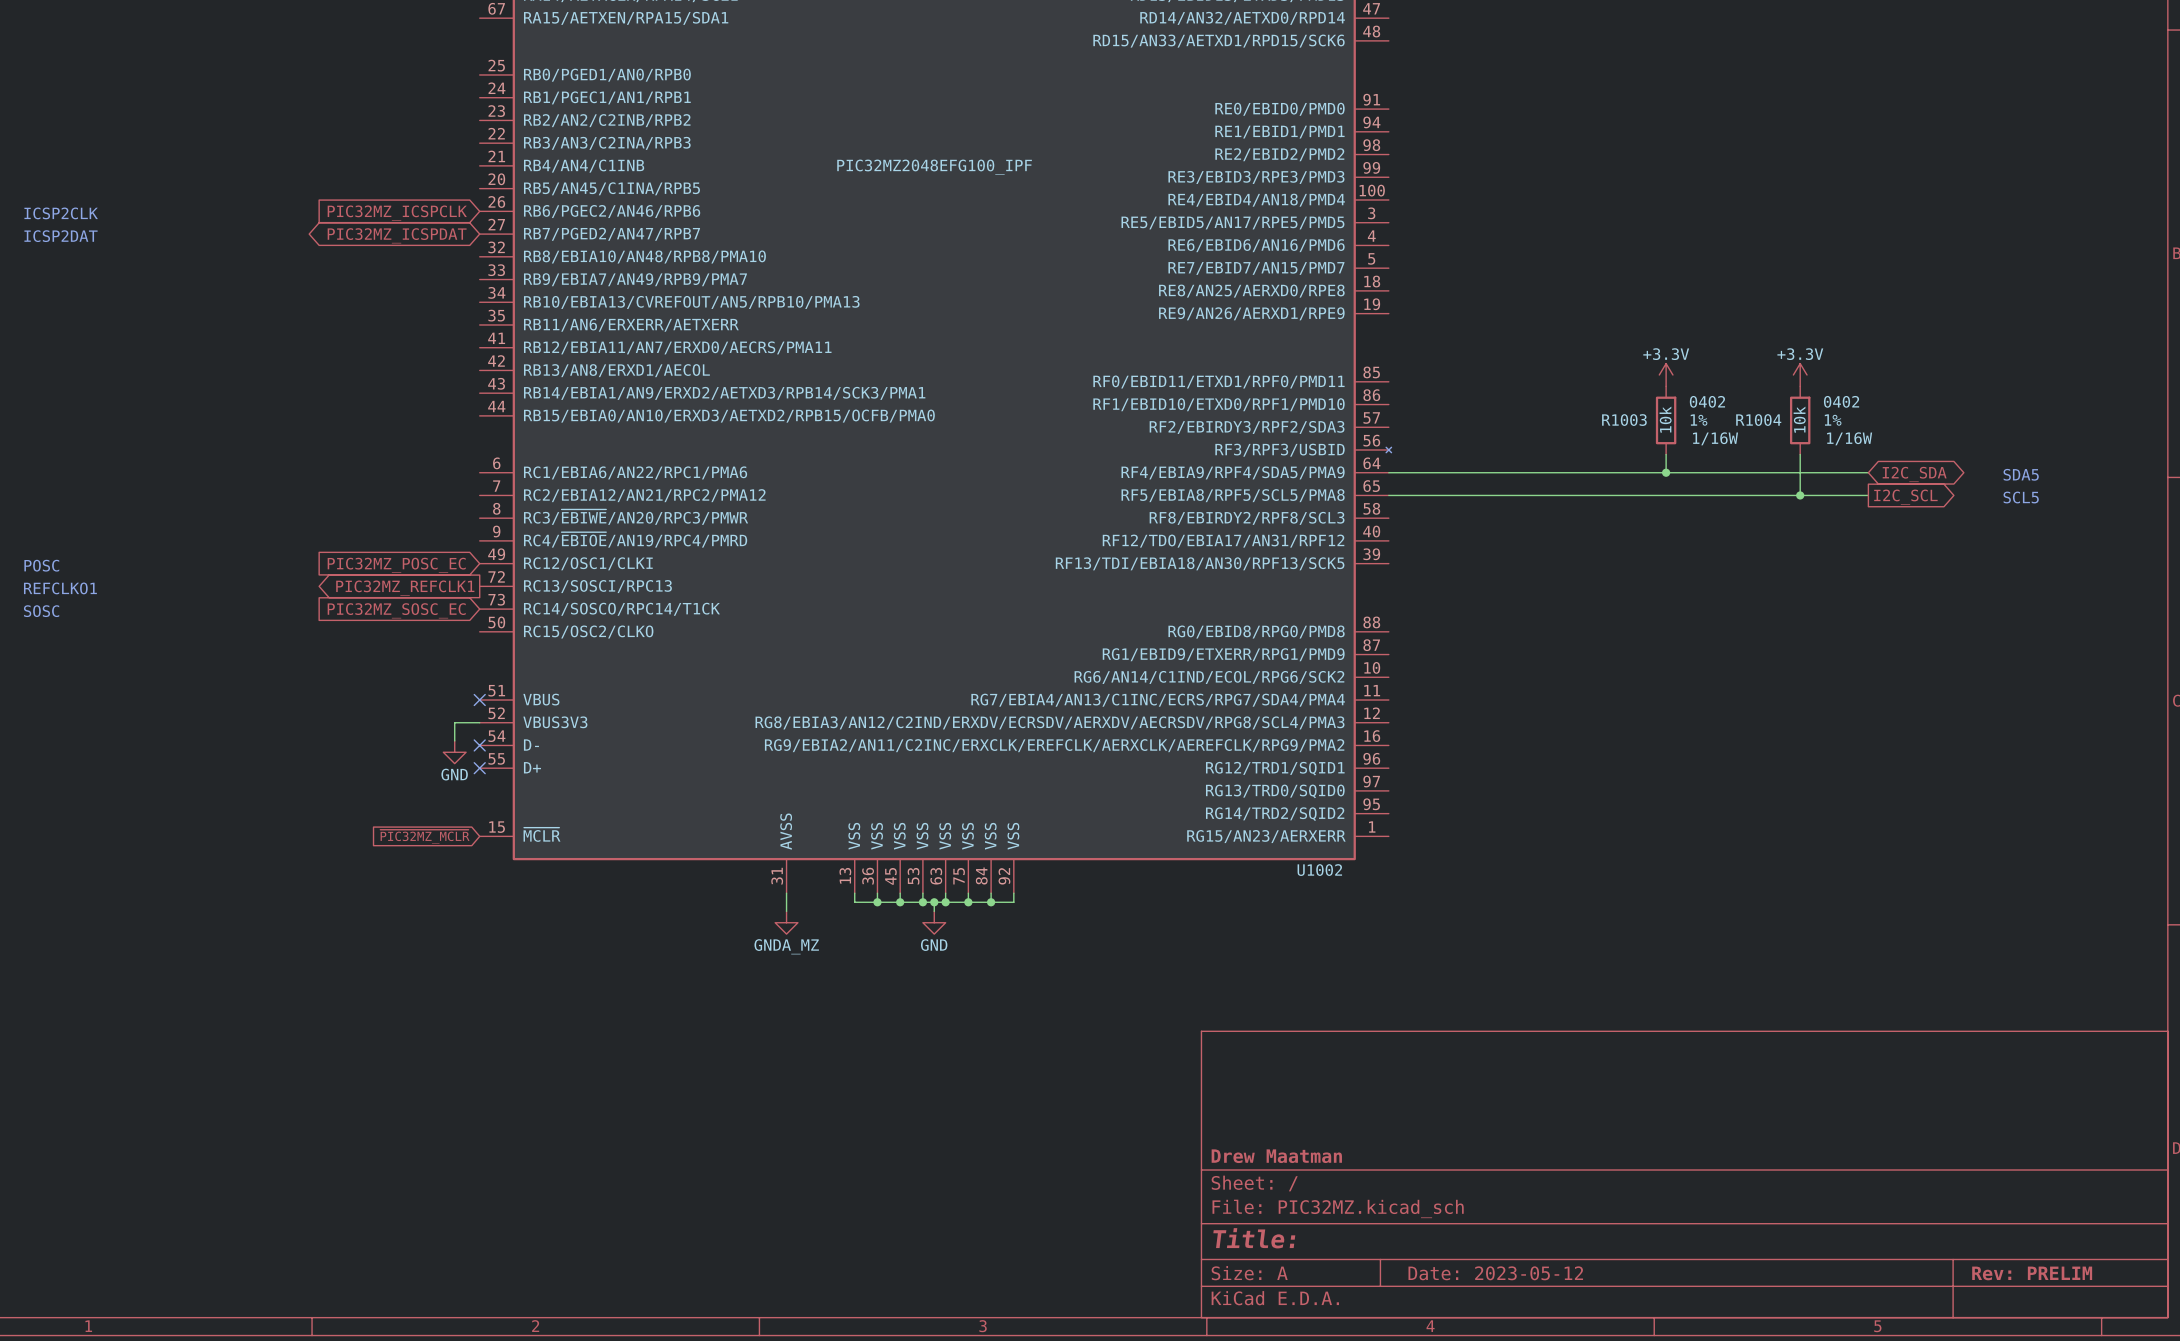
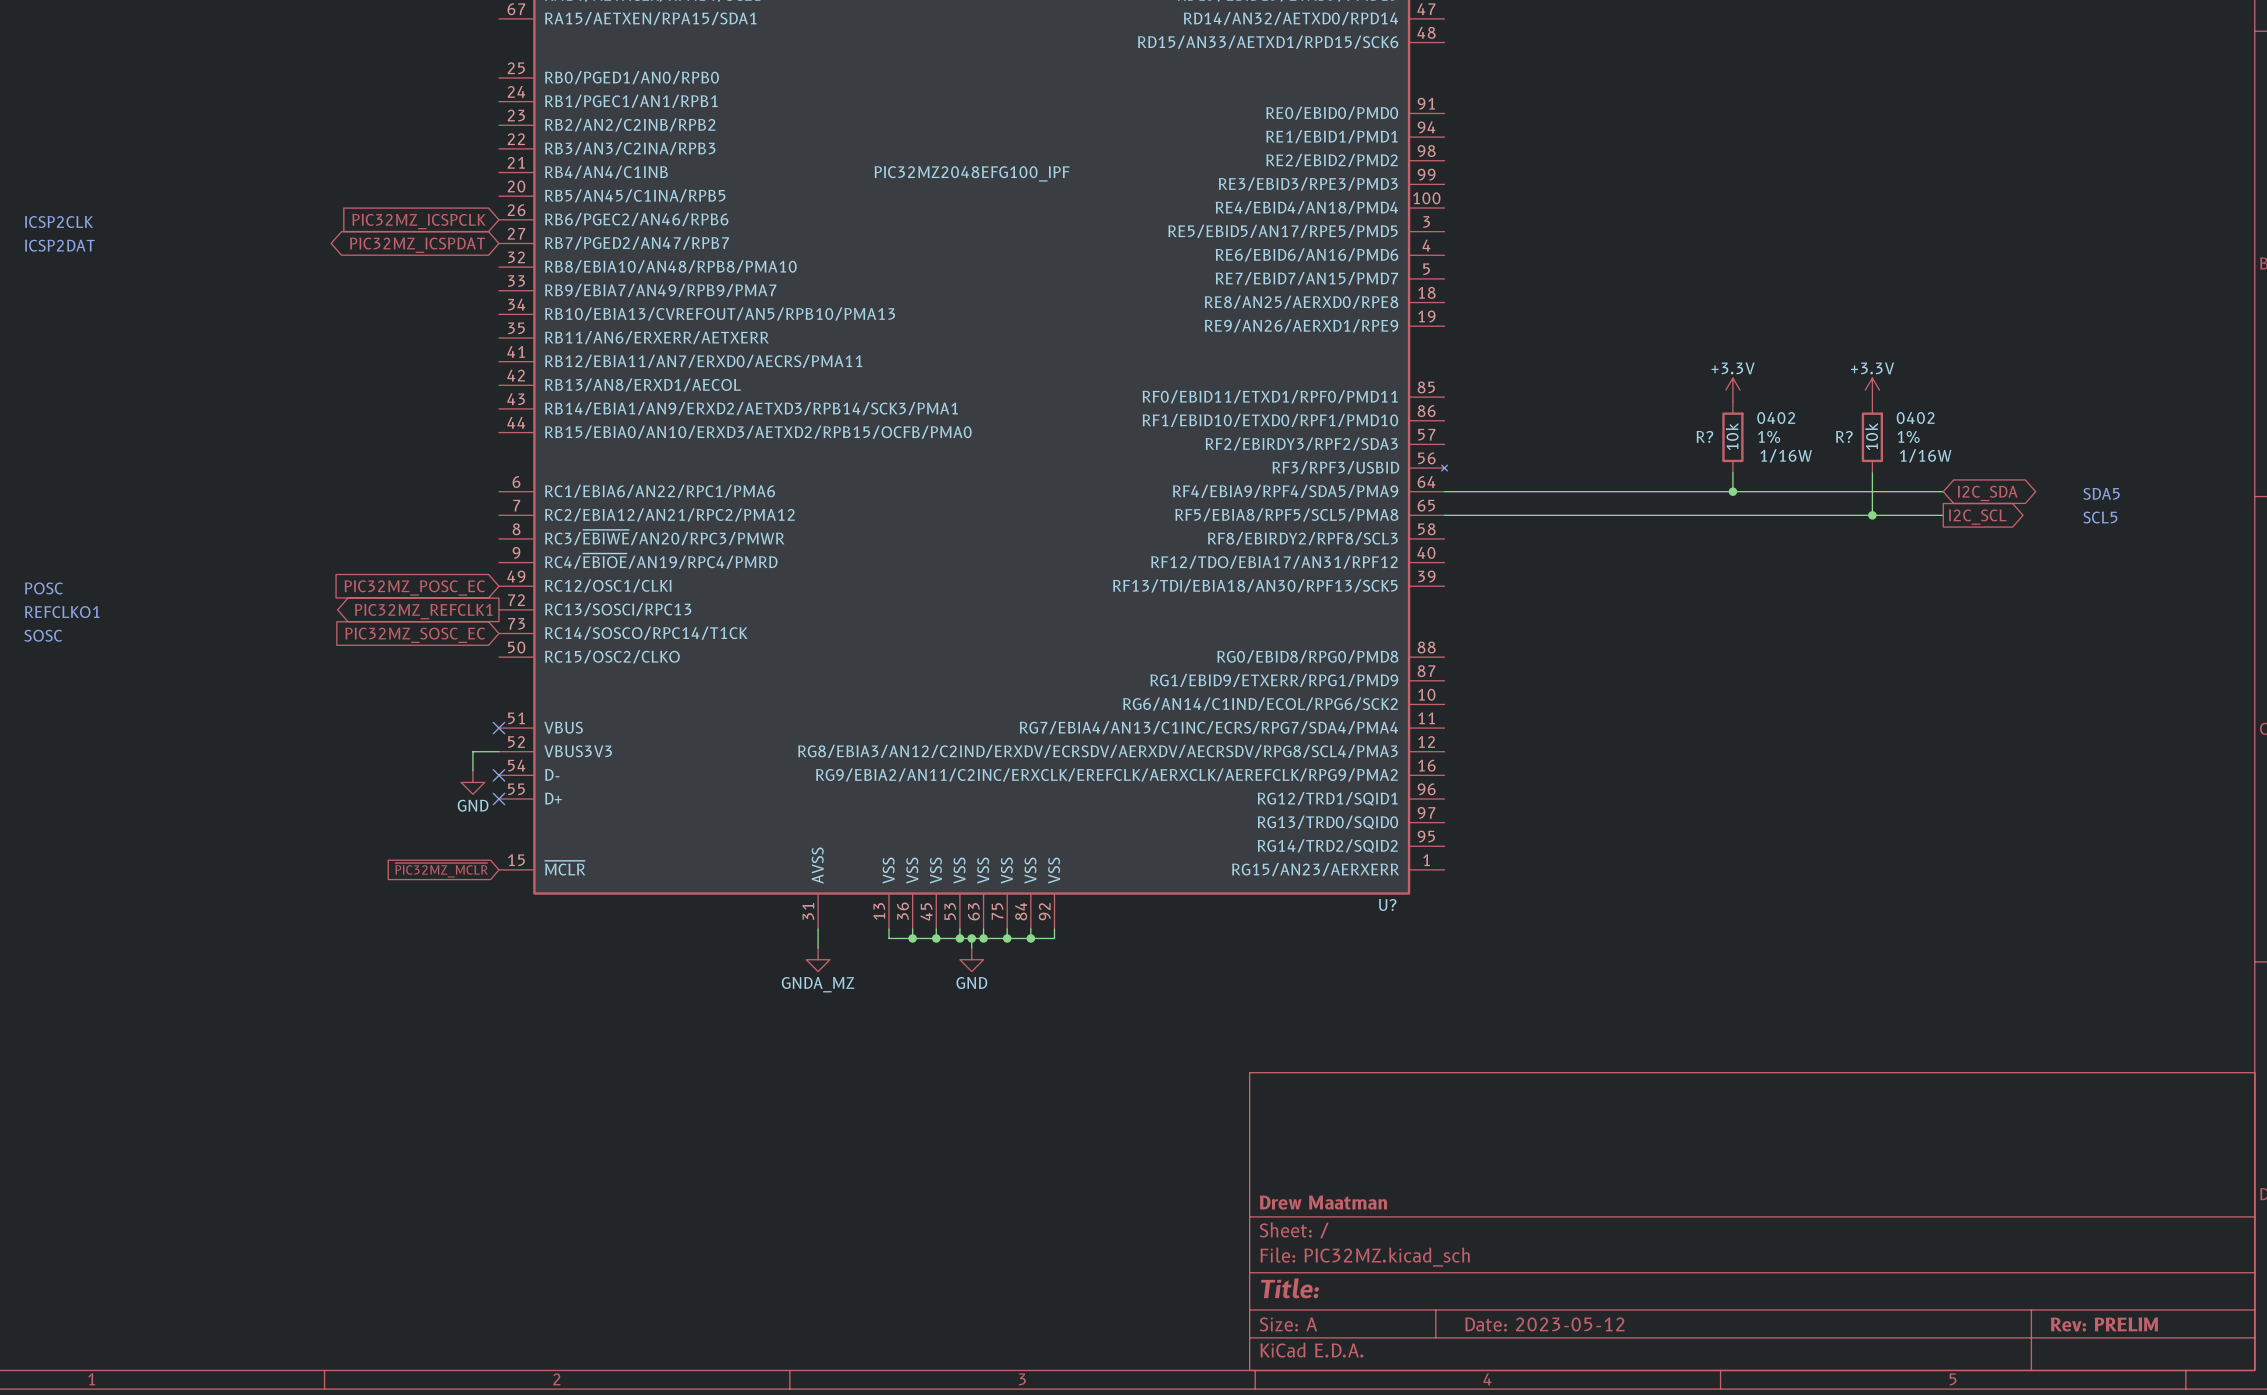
R1003 name: R1003 (1624, 420) -> R? (1704, 436)
R1004 name: R1004 (1758, 420) -> R? (1844, 436)
U1002 name: U1002 (1319, 870) -> U? (1387, 904)

